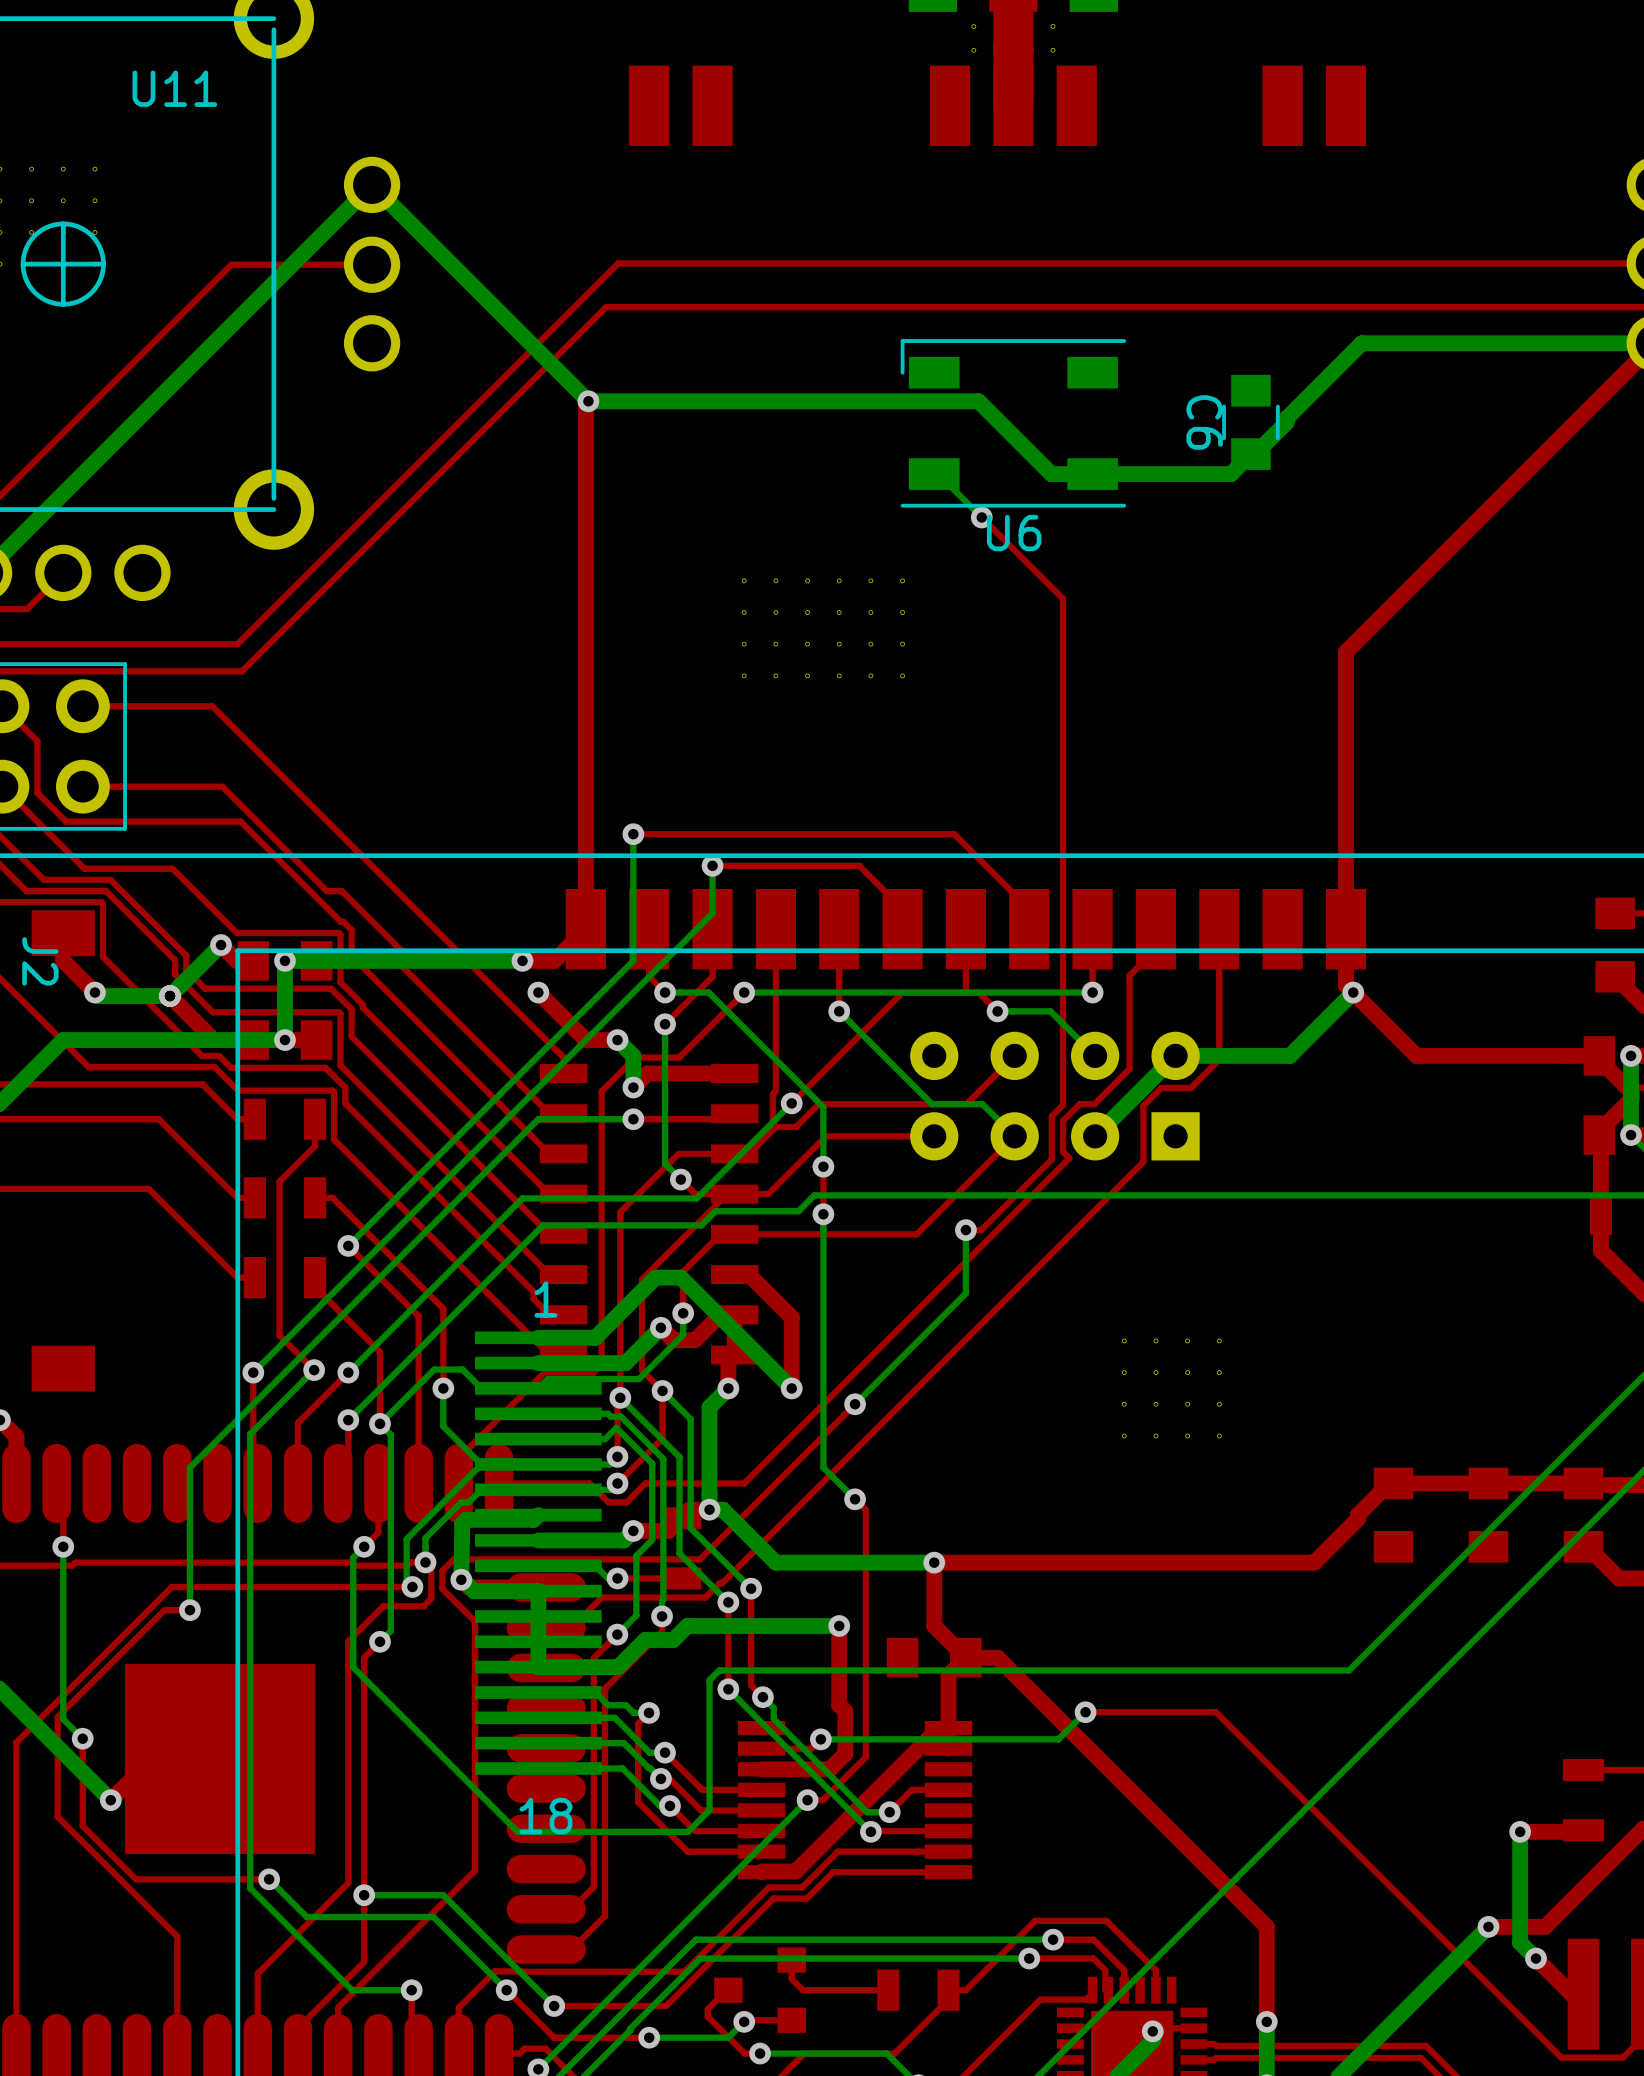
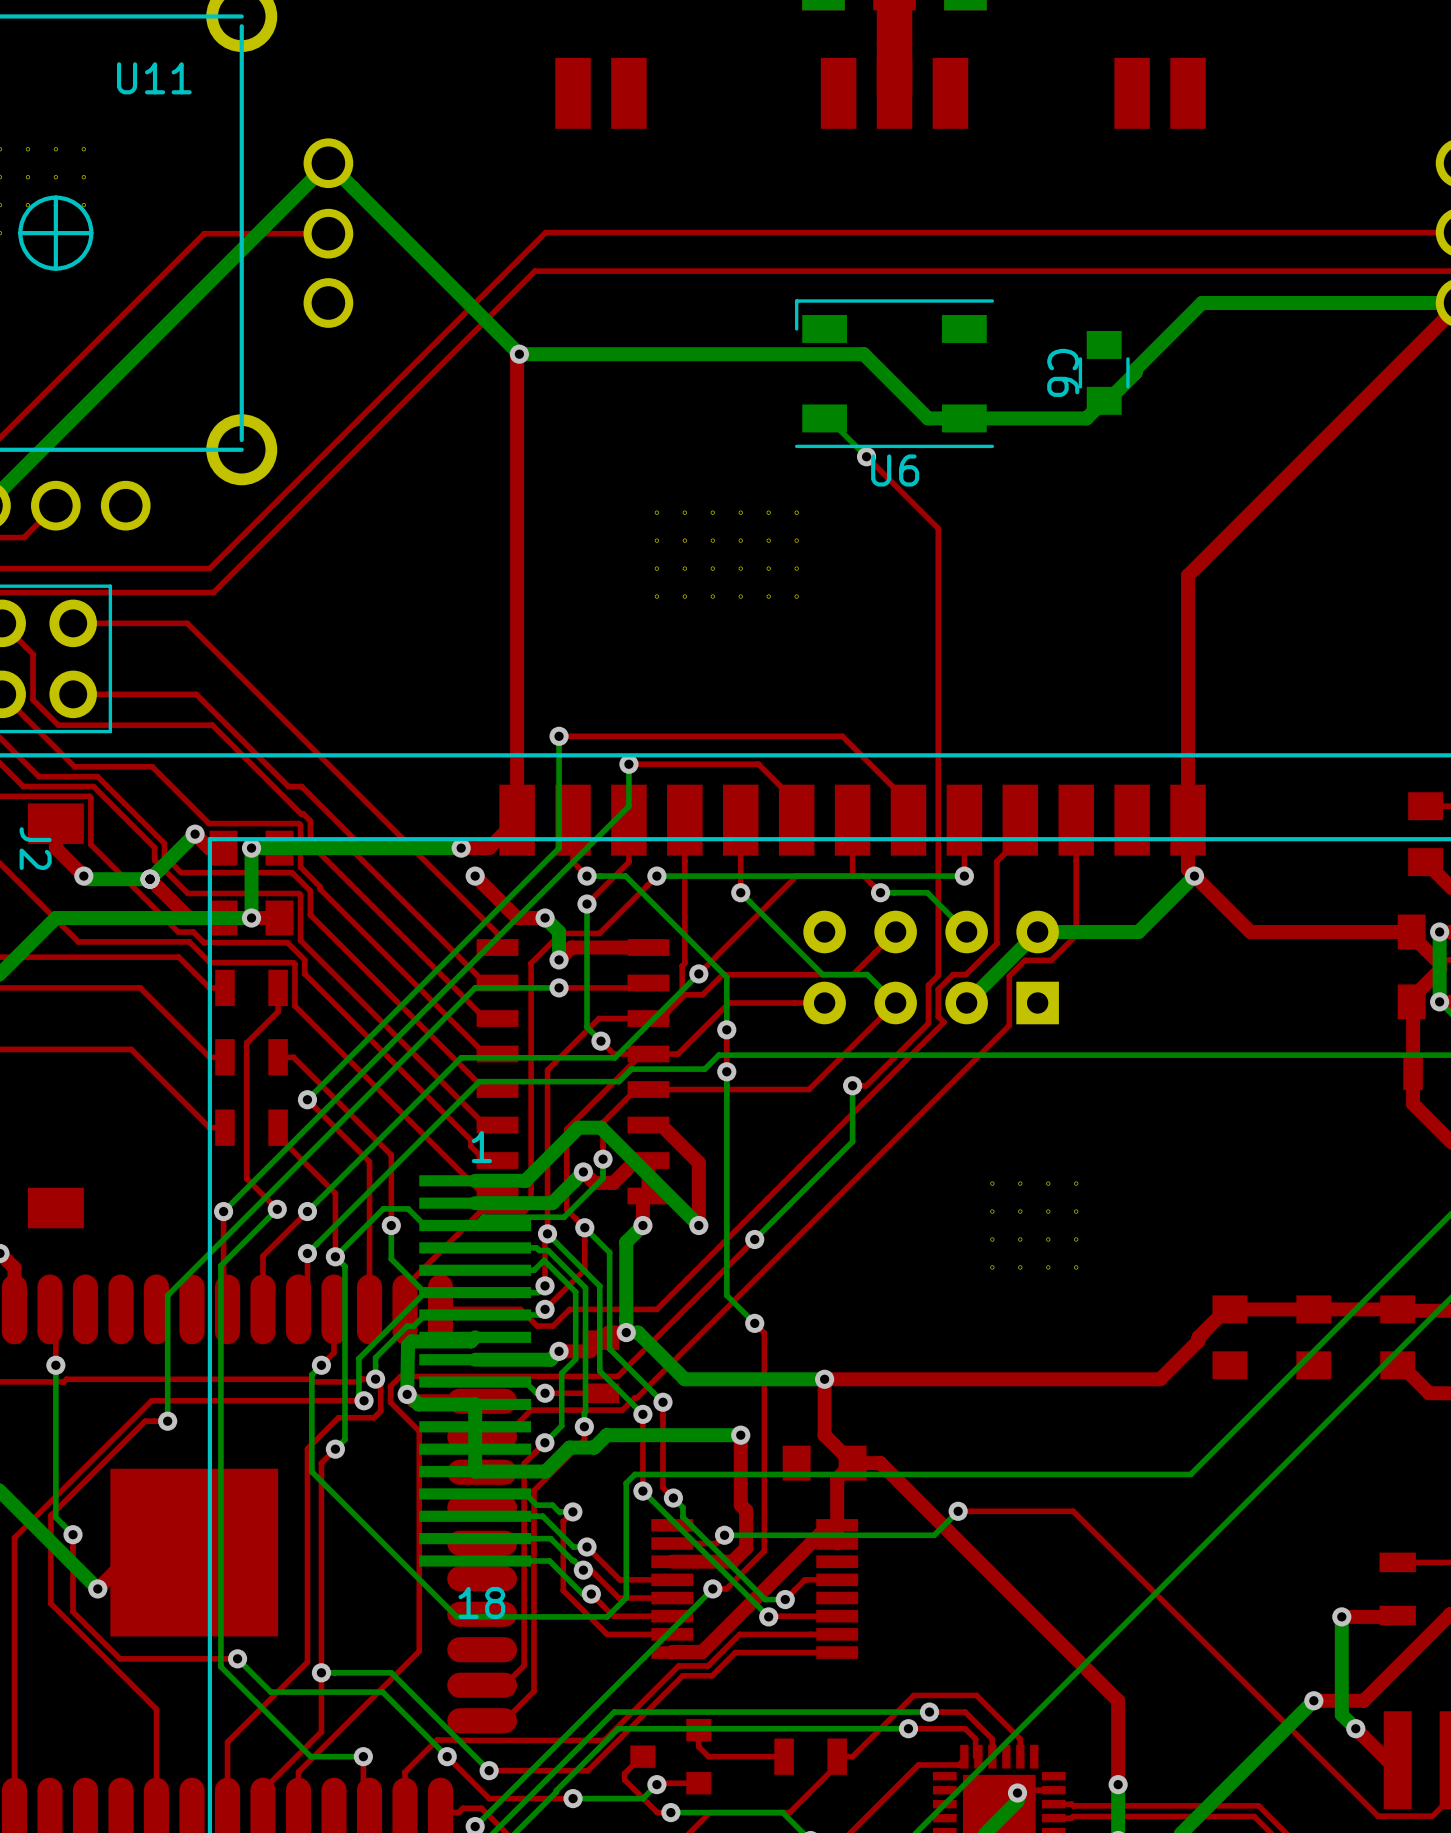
part: (973, 26) -> none
part: (1053, 26) -> none
part: (973, 50) -> none
part: (1053, 50) -> none

